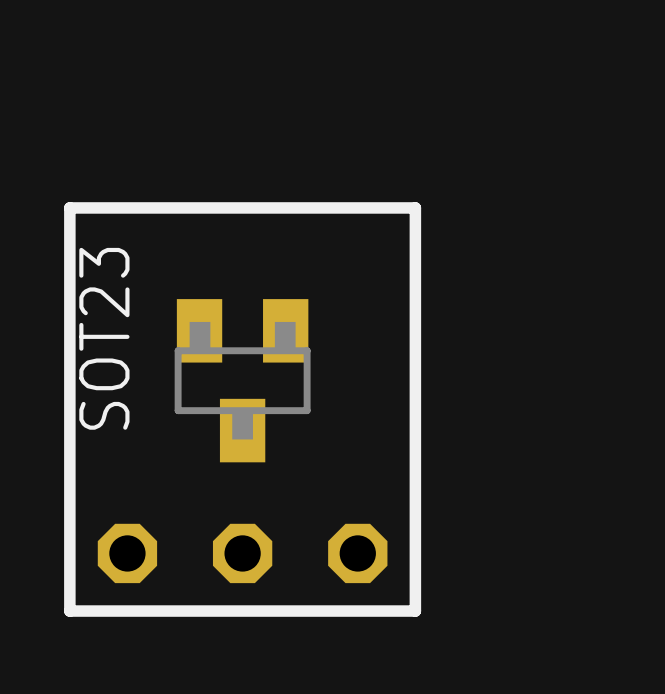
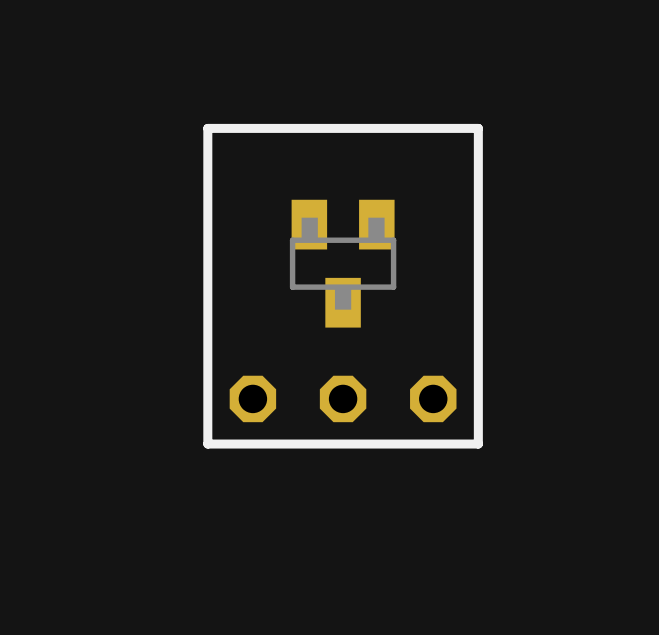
text: SOT23 (104, 338) -> none

